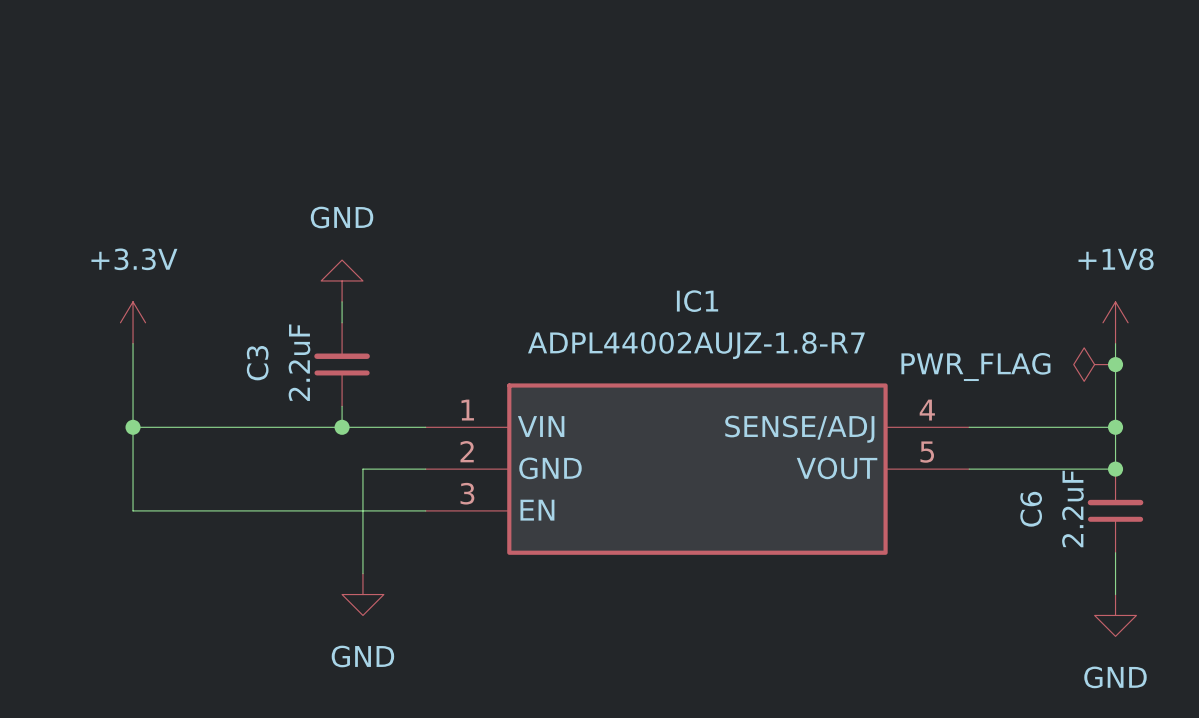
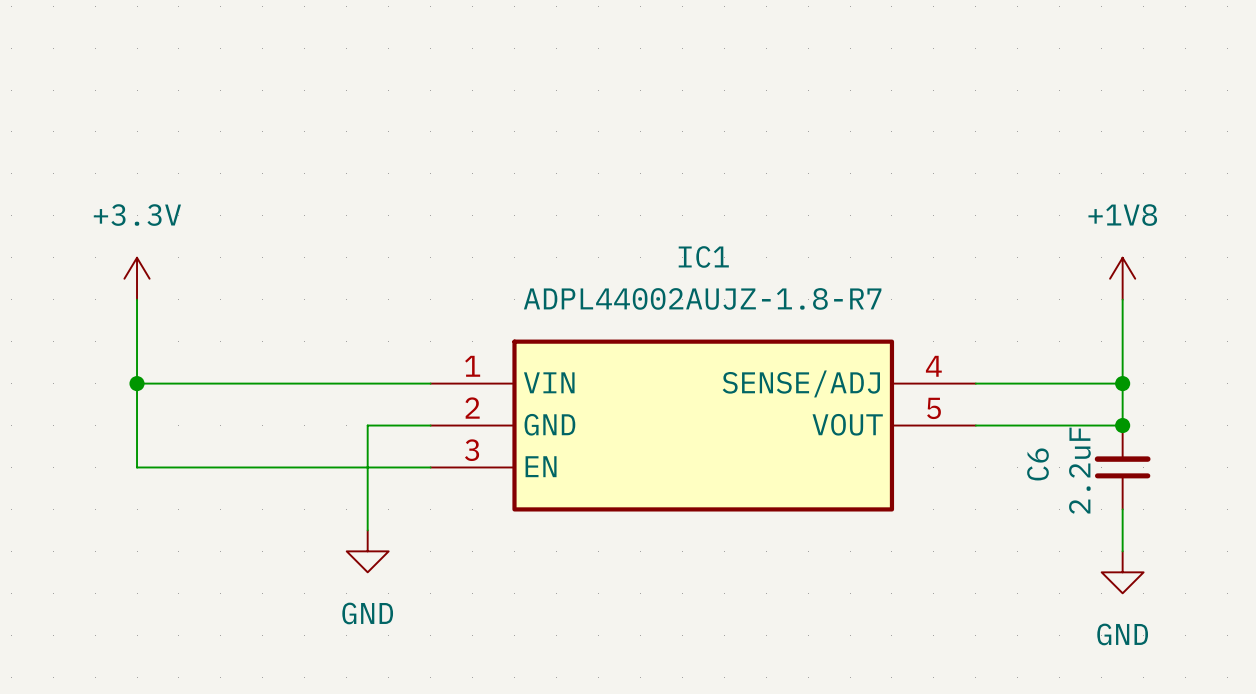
power symbol: GND (342, 280) -> none
wire: (342, 301) (342, 322) -> none
C3: 2.2uF (342, 364) -> none
power symbol: PWR_FLAG (1094, 364) -> none
junction: (1115, 364) -> none
wire: (342, 406) (342, 427) -> none
junction: (342, 427) -> none

